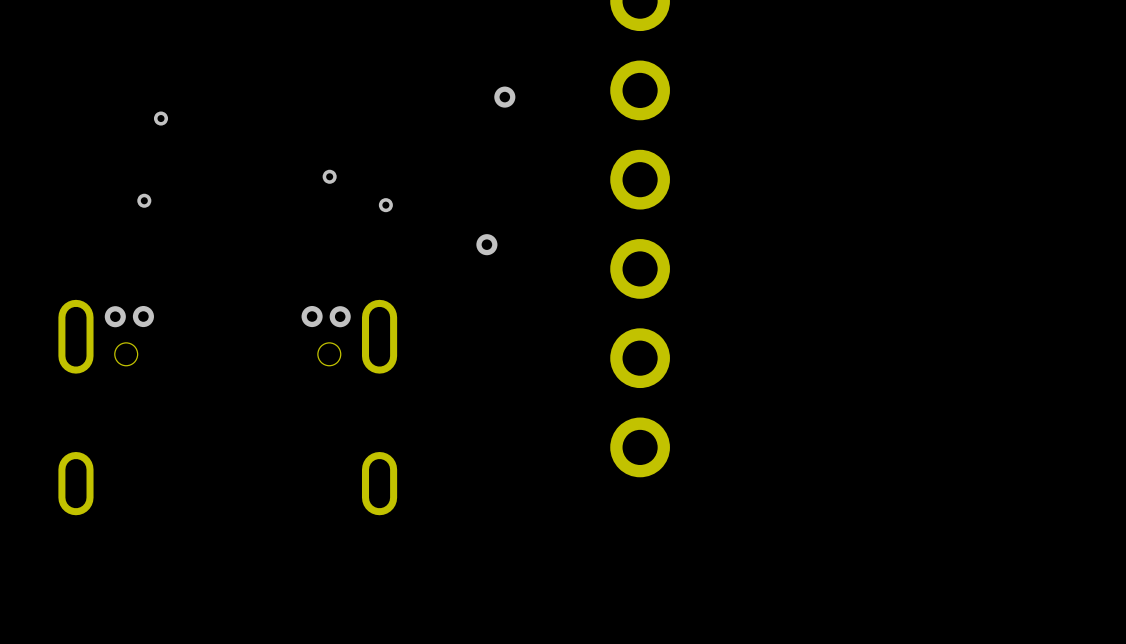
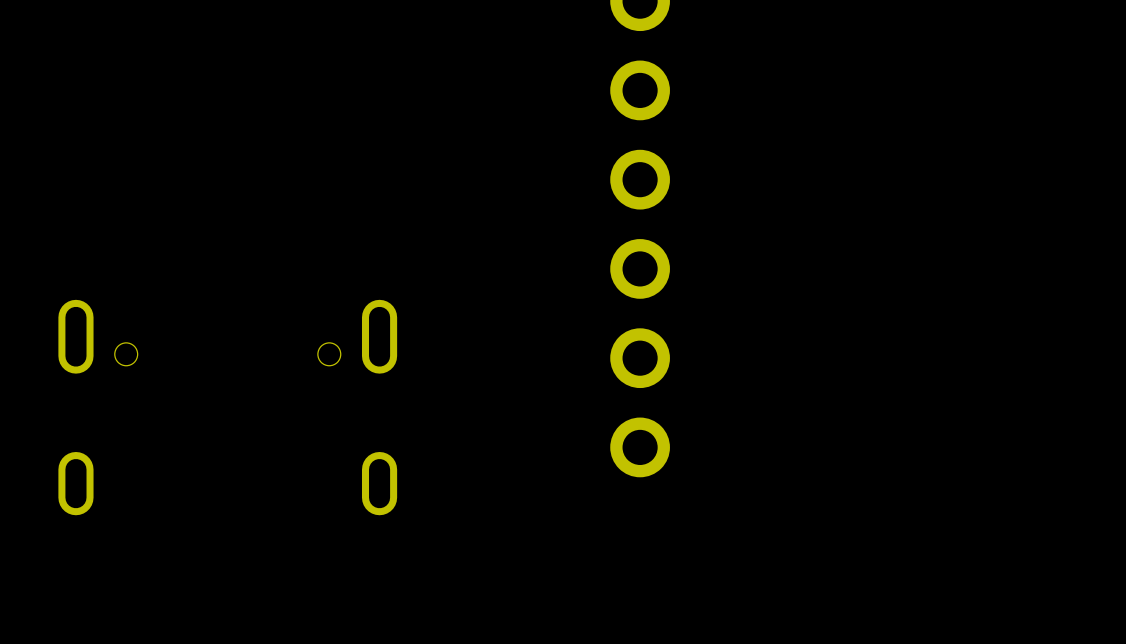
via: (504, 97) -> none
via: (161, 118) -> none
via: (329, 176) -> none
via: (144, 200) -> none
via: (385, 205) -> none
via: (486, 244) -> none
via: (115, 316) -> none
via: (143, 316) -> none
via: (312, 316) -> none
via: (340, 316) -> none

